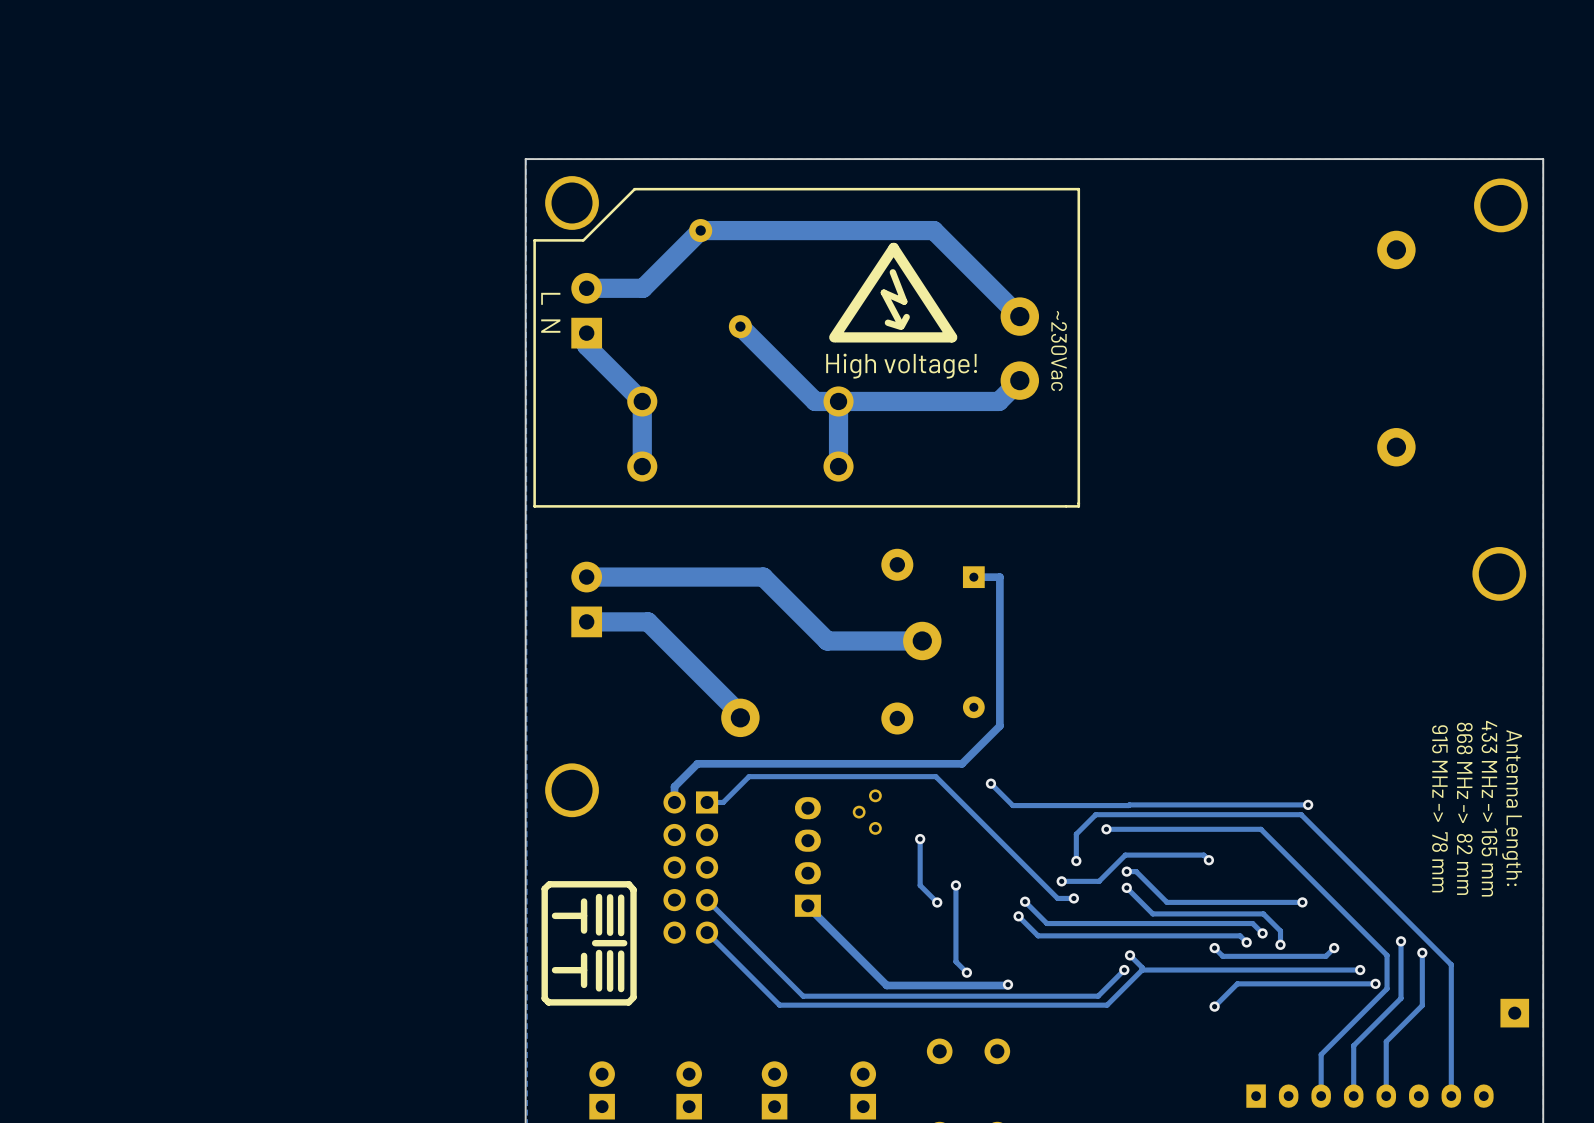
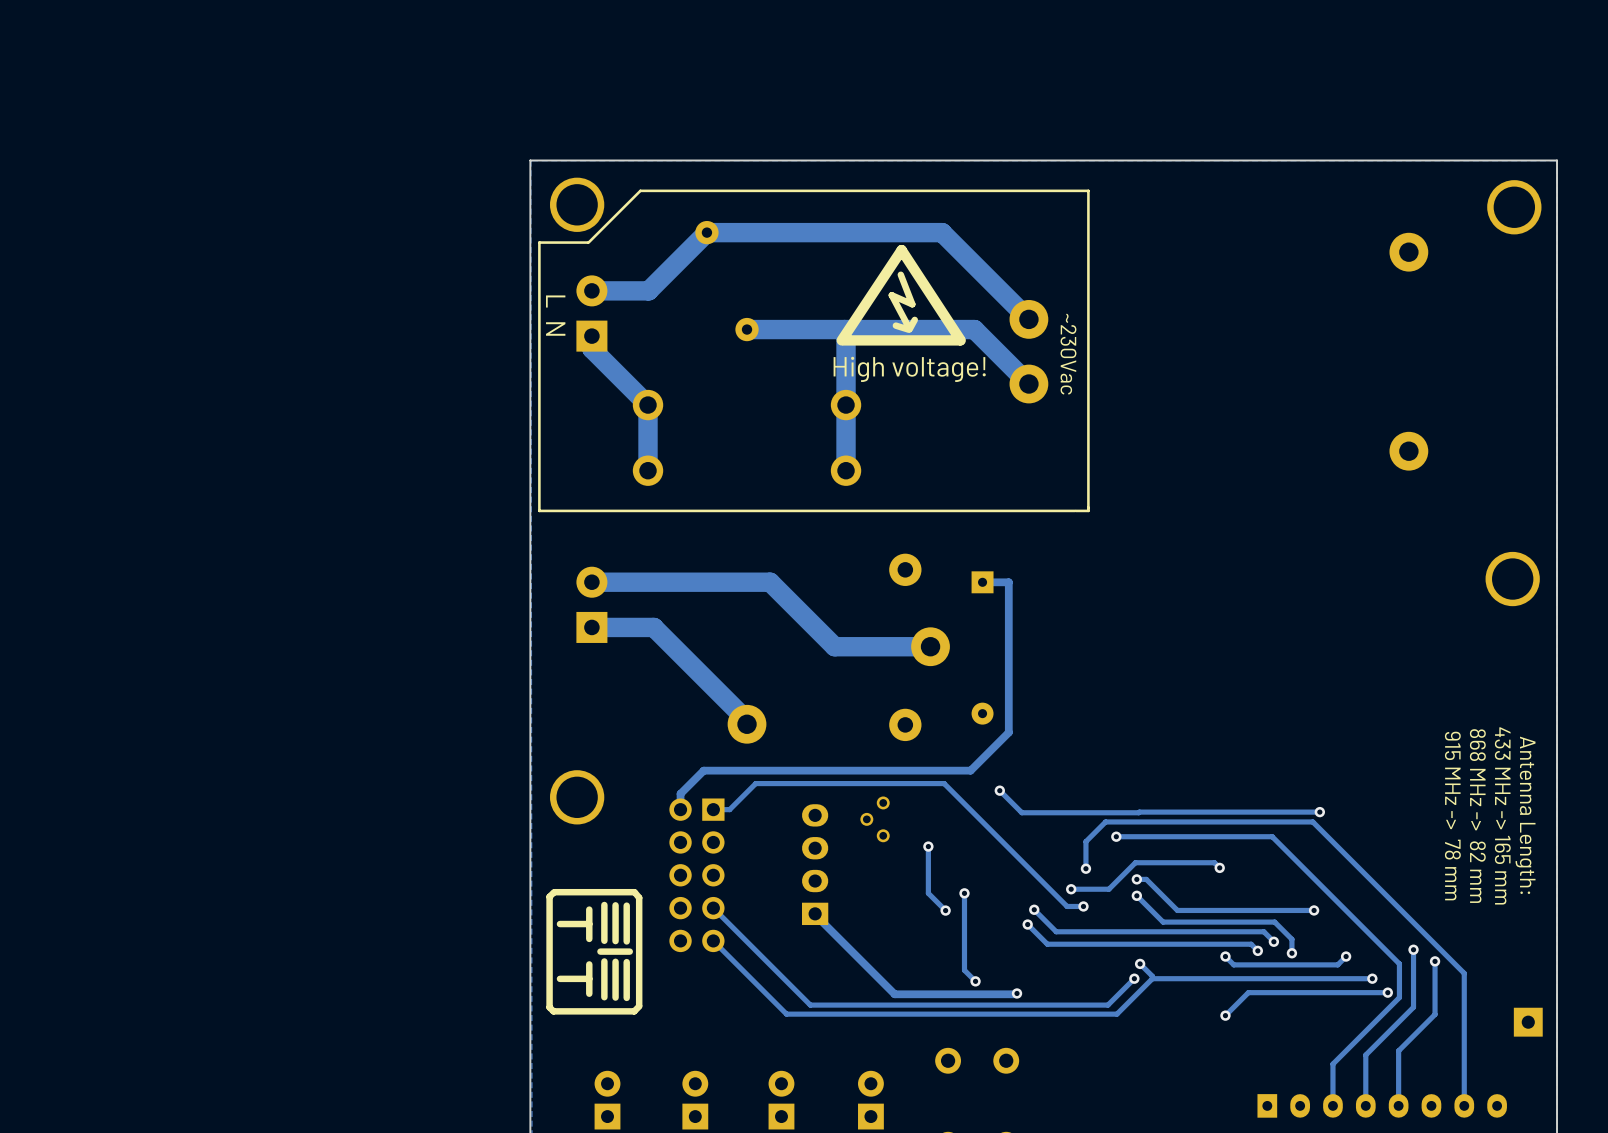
track: (740, 326) (815, 401) (998, 401) (1019, 380) -> (747, 329) (974, 329) (1028, 384)
track: none -> (844, 329) (846, 405)

